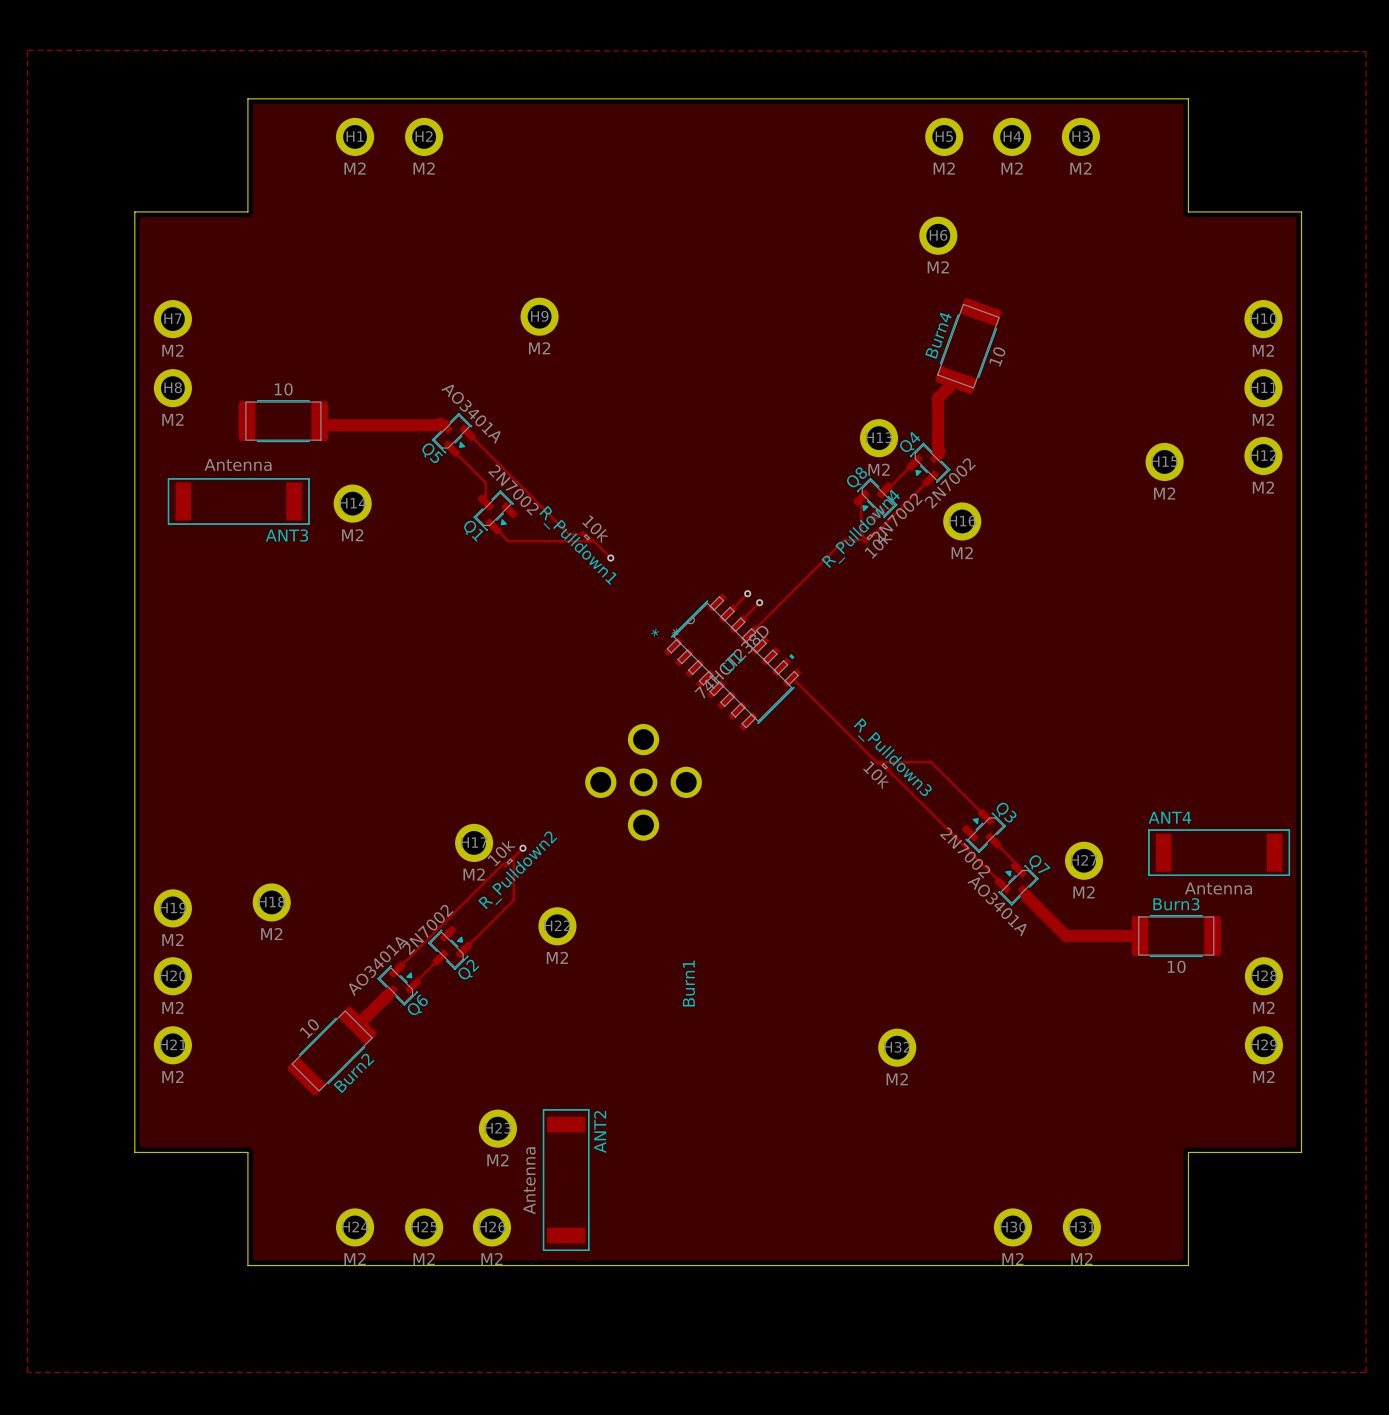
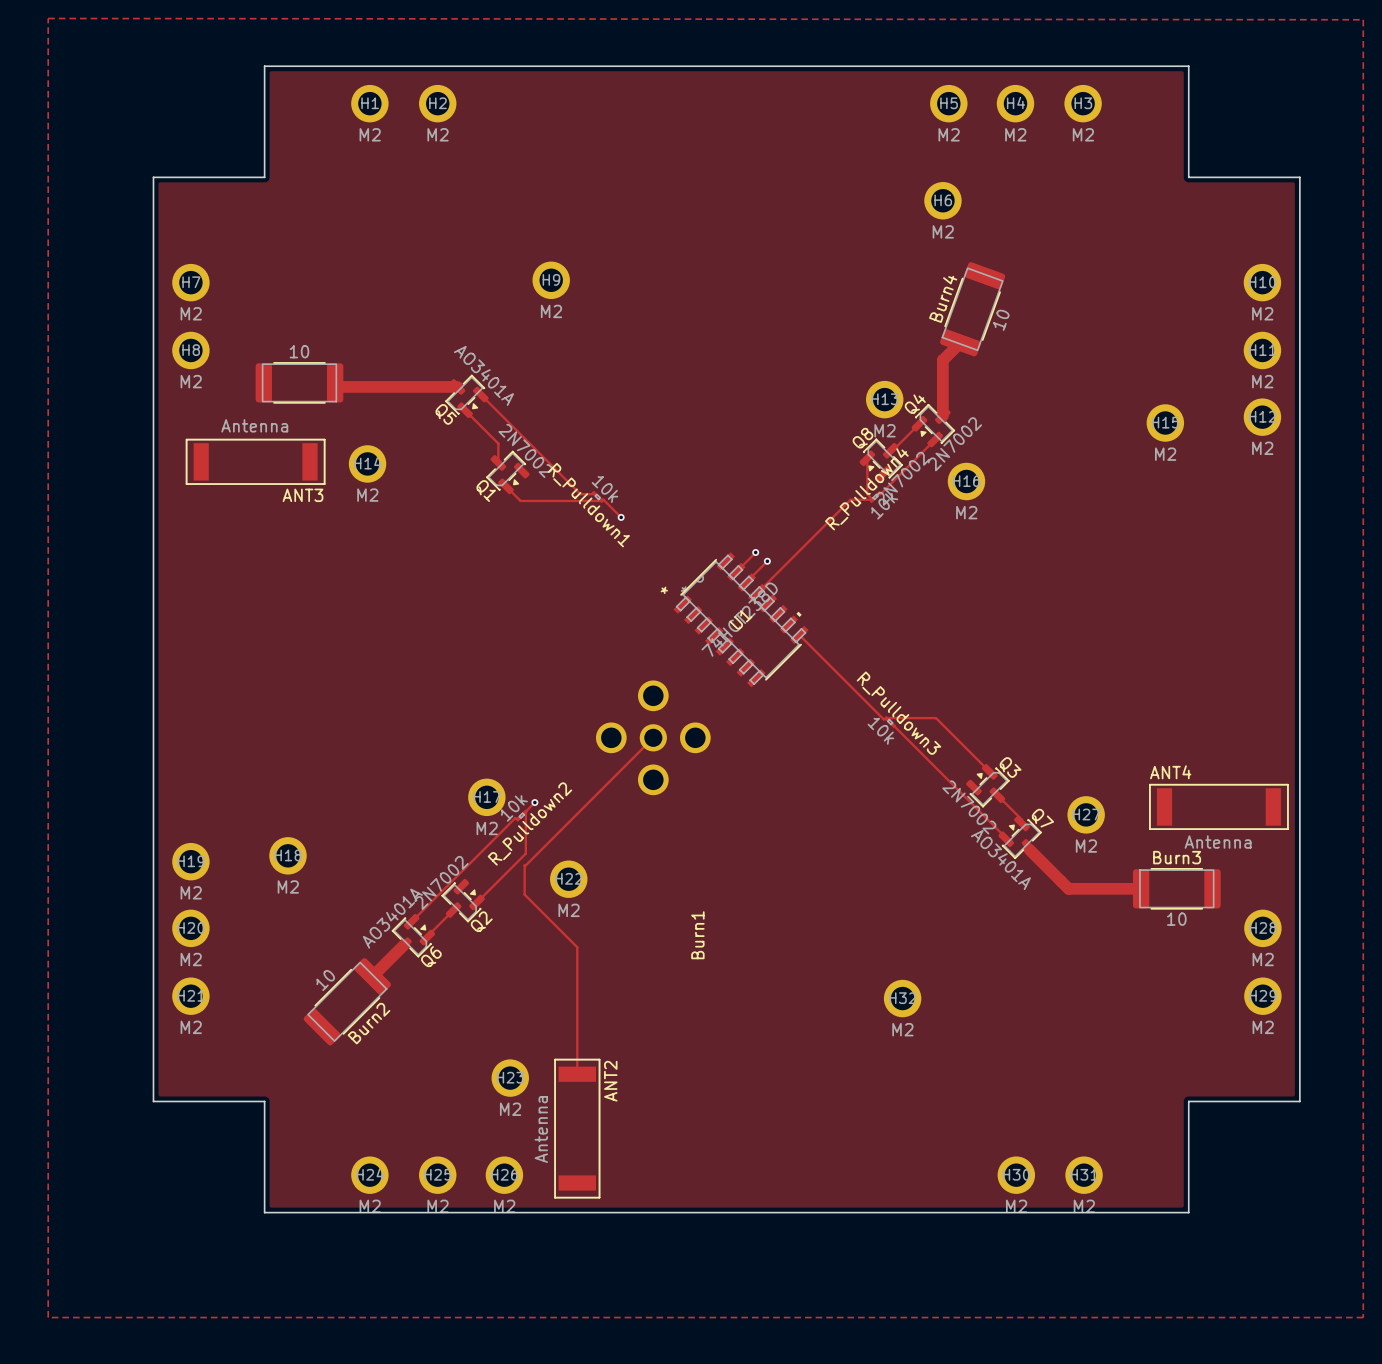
track: none -> (653, 737) (524, 865) (524, 894) (577, 947) (577, 1074)

